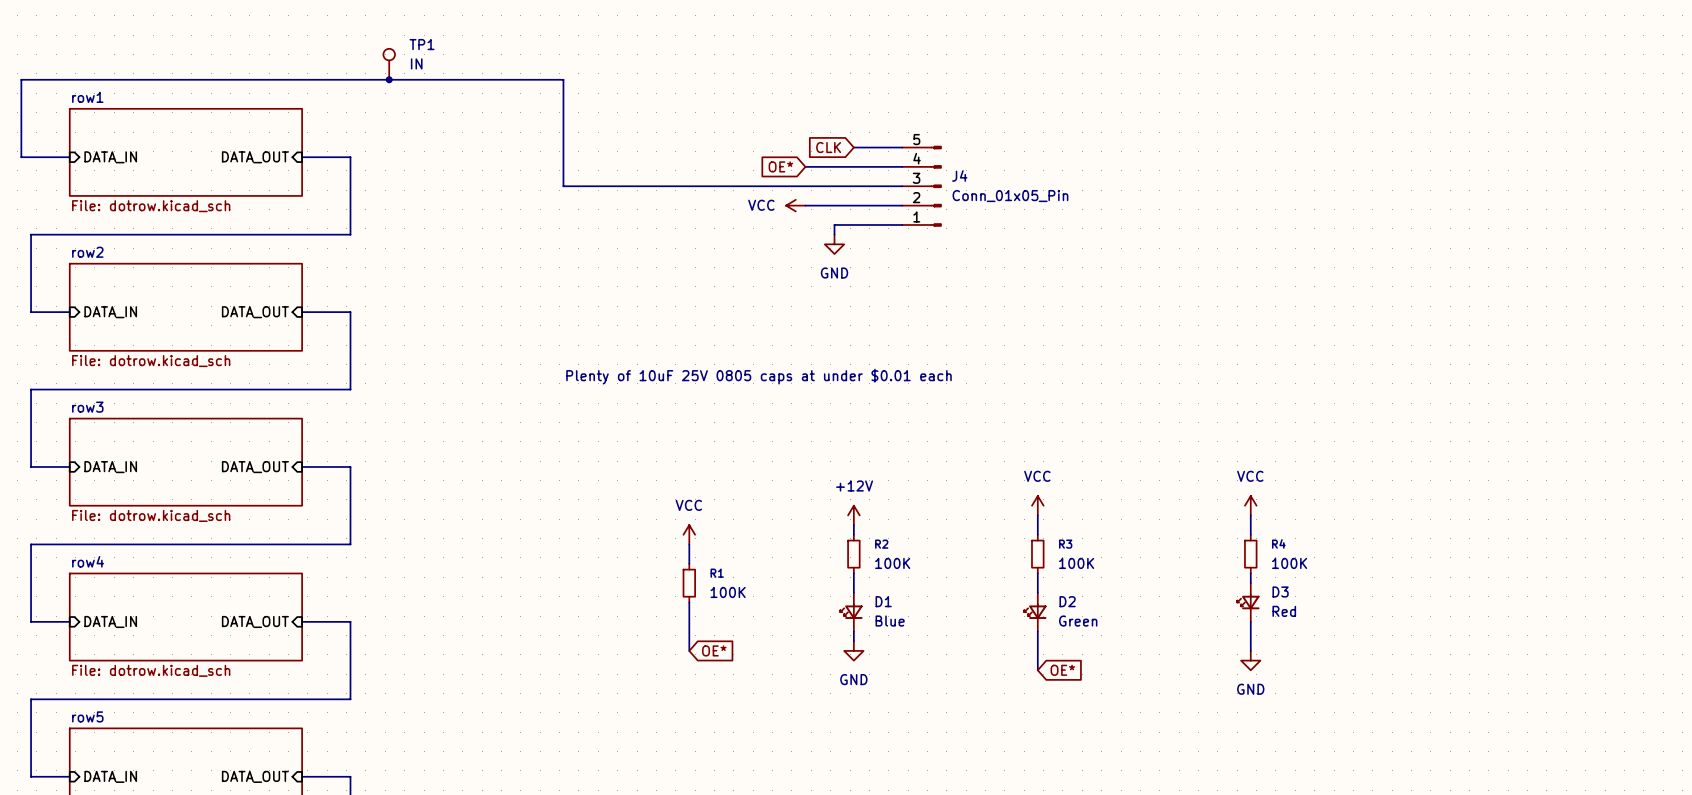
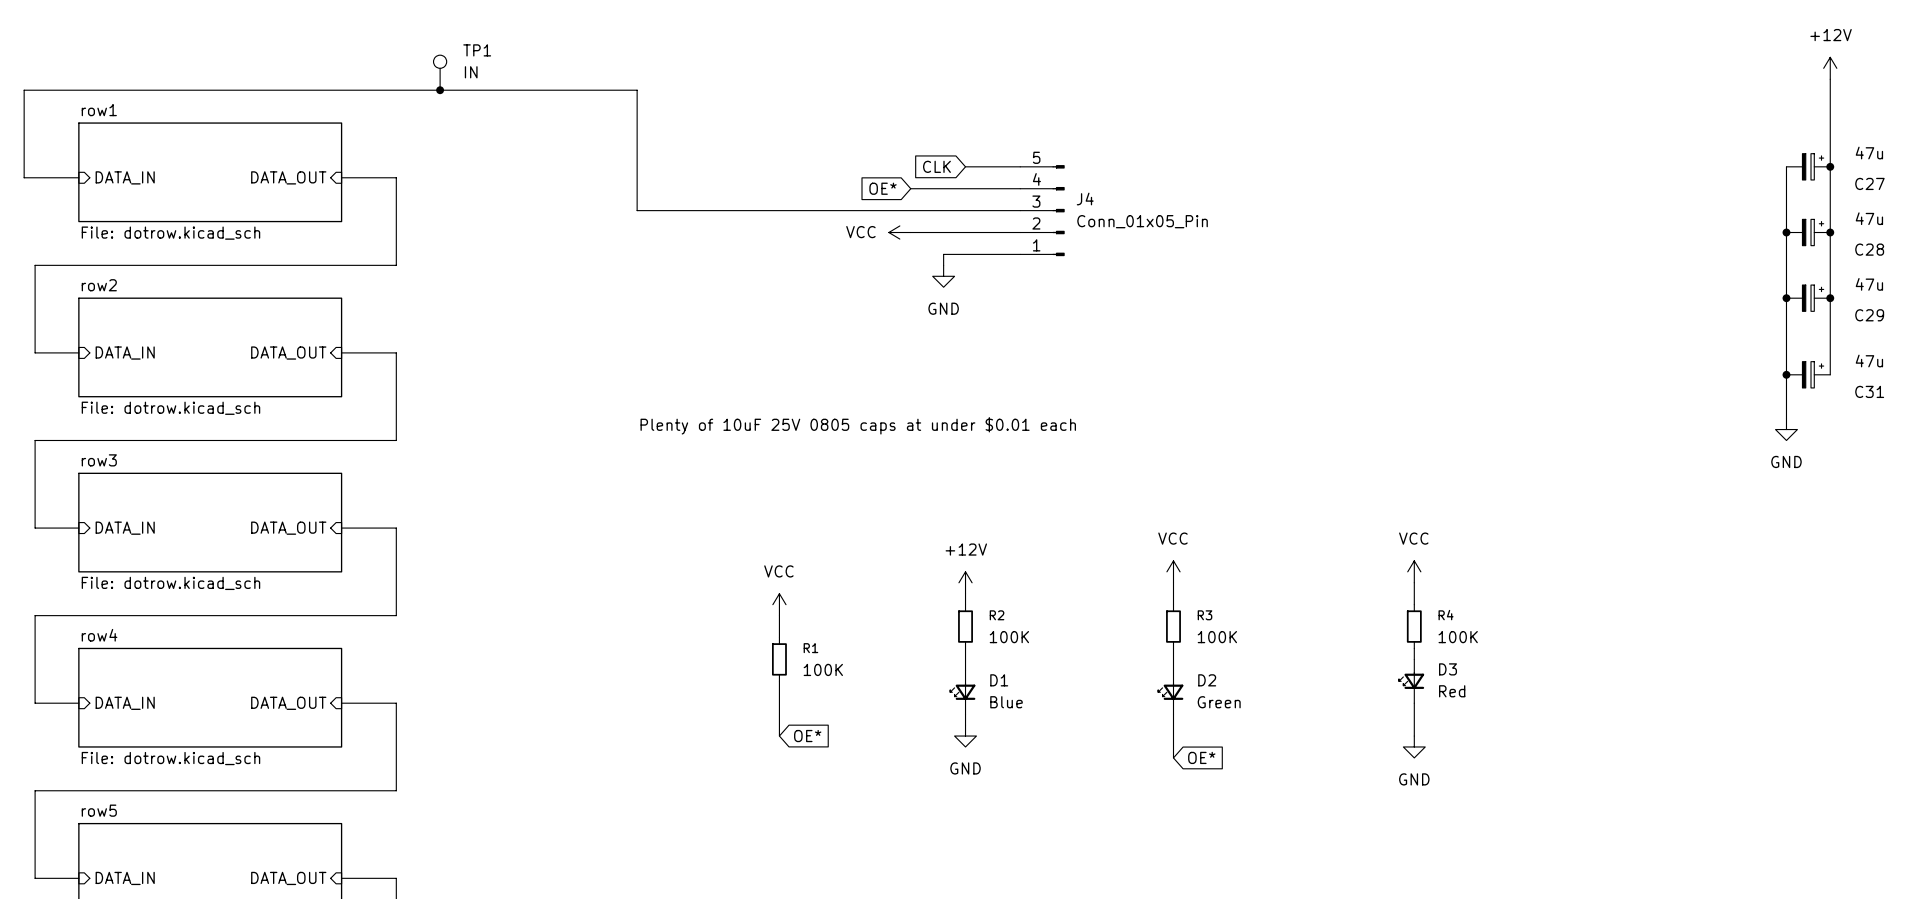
power symbol: none -> +12V (1830, 68)
wire: none -> (1830, 79) (1830, 374)
wire: none -> (1786, 166) (1786, 418)
C27: none -> 47u (1808, 166)
junction: none -> (1830, 166)
junction: none -> (1786, 232)
C28: none -> 47u (1808, 232)
junction: none -> (1830, 232)
junction: none -> (1786, 298)
C29: none -> 47u (1808, 298)
junction: none -> (1830, 298)
junction: none -> (1786, 374)
C31: none -> 47u (1808, 374)
power symbol: none -> GND (1786, 429)

